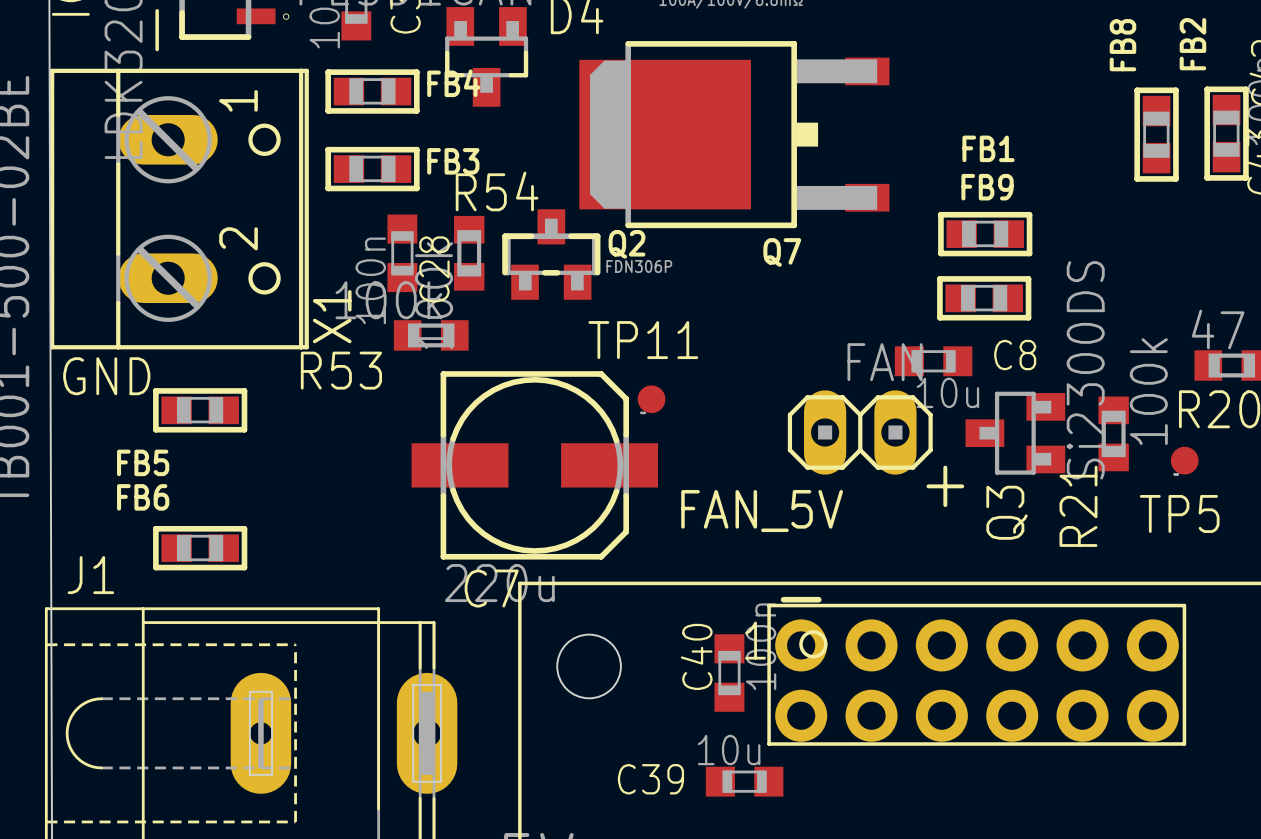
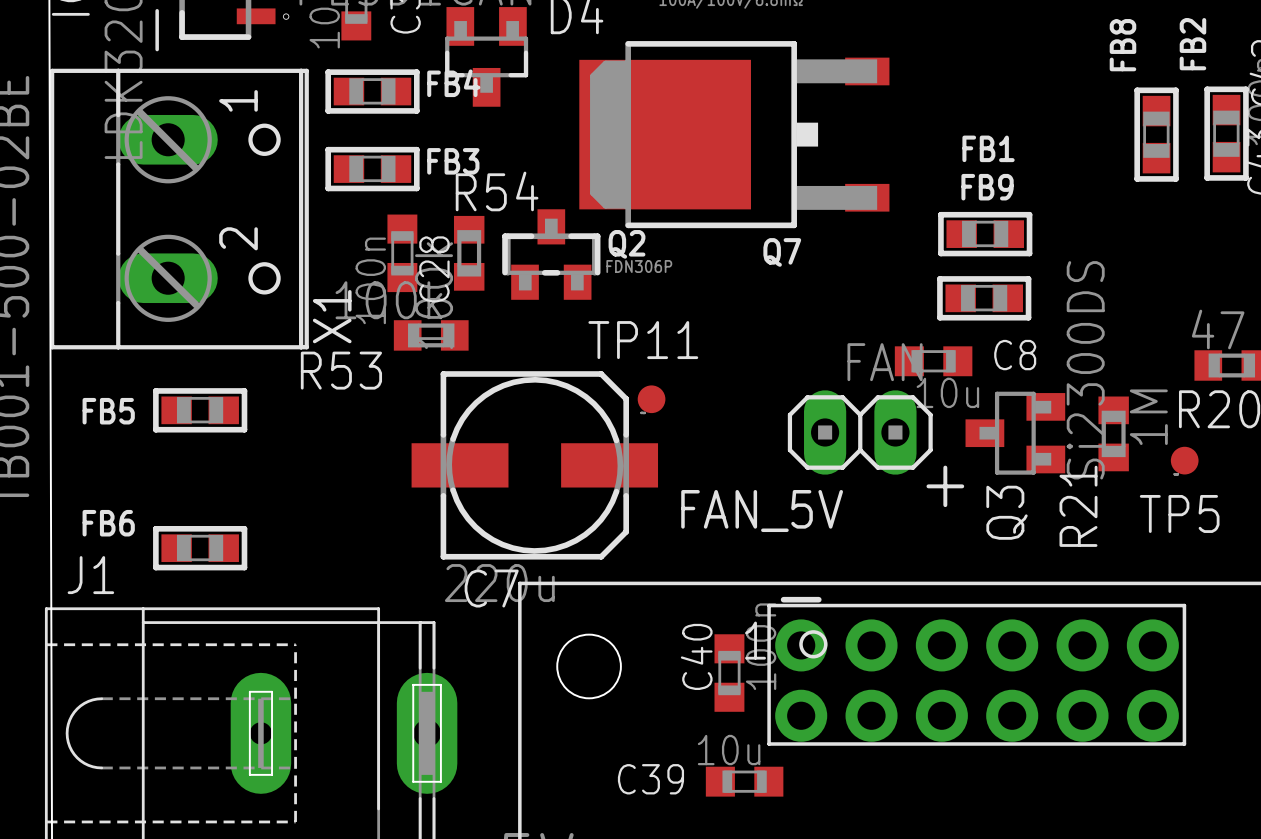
text: GND (106, 376) -> none
R21 value: 100k (1148, 391) -> 1M (1148, 417)
FB5 name position: FB5 (143, 462) -> FB5 (108, 411)
FB6 name position: FB6 (143, 497) -> FB6 (108, 523)

